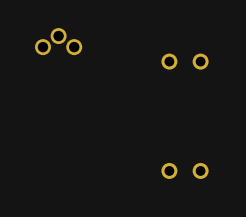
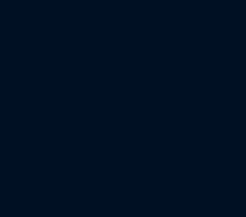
part: (58, 41) -> none
part: (185, 61) -> none
part: (185, 170) -> none

